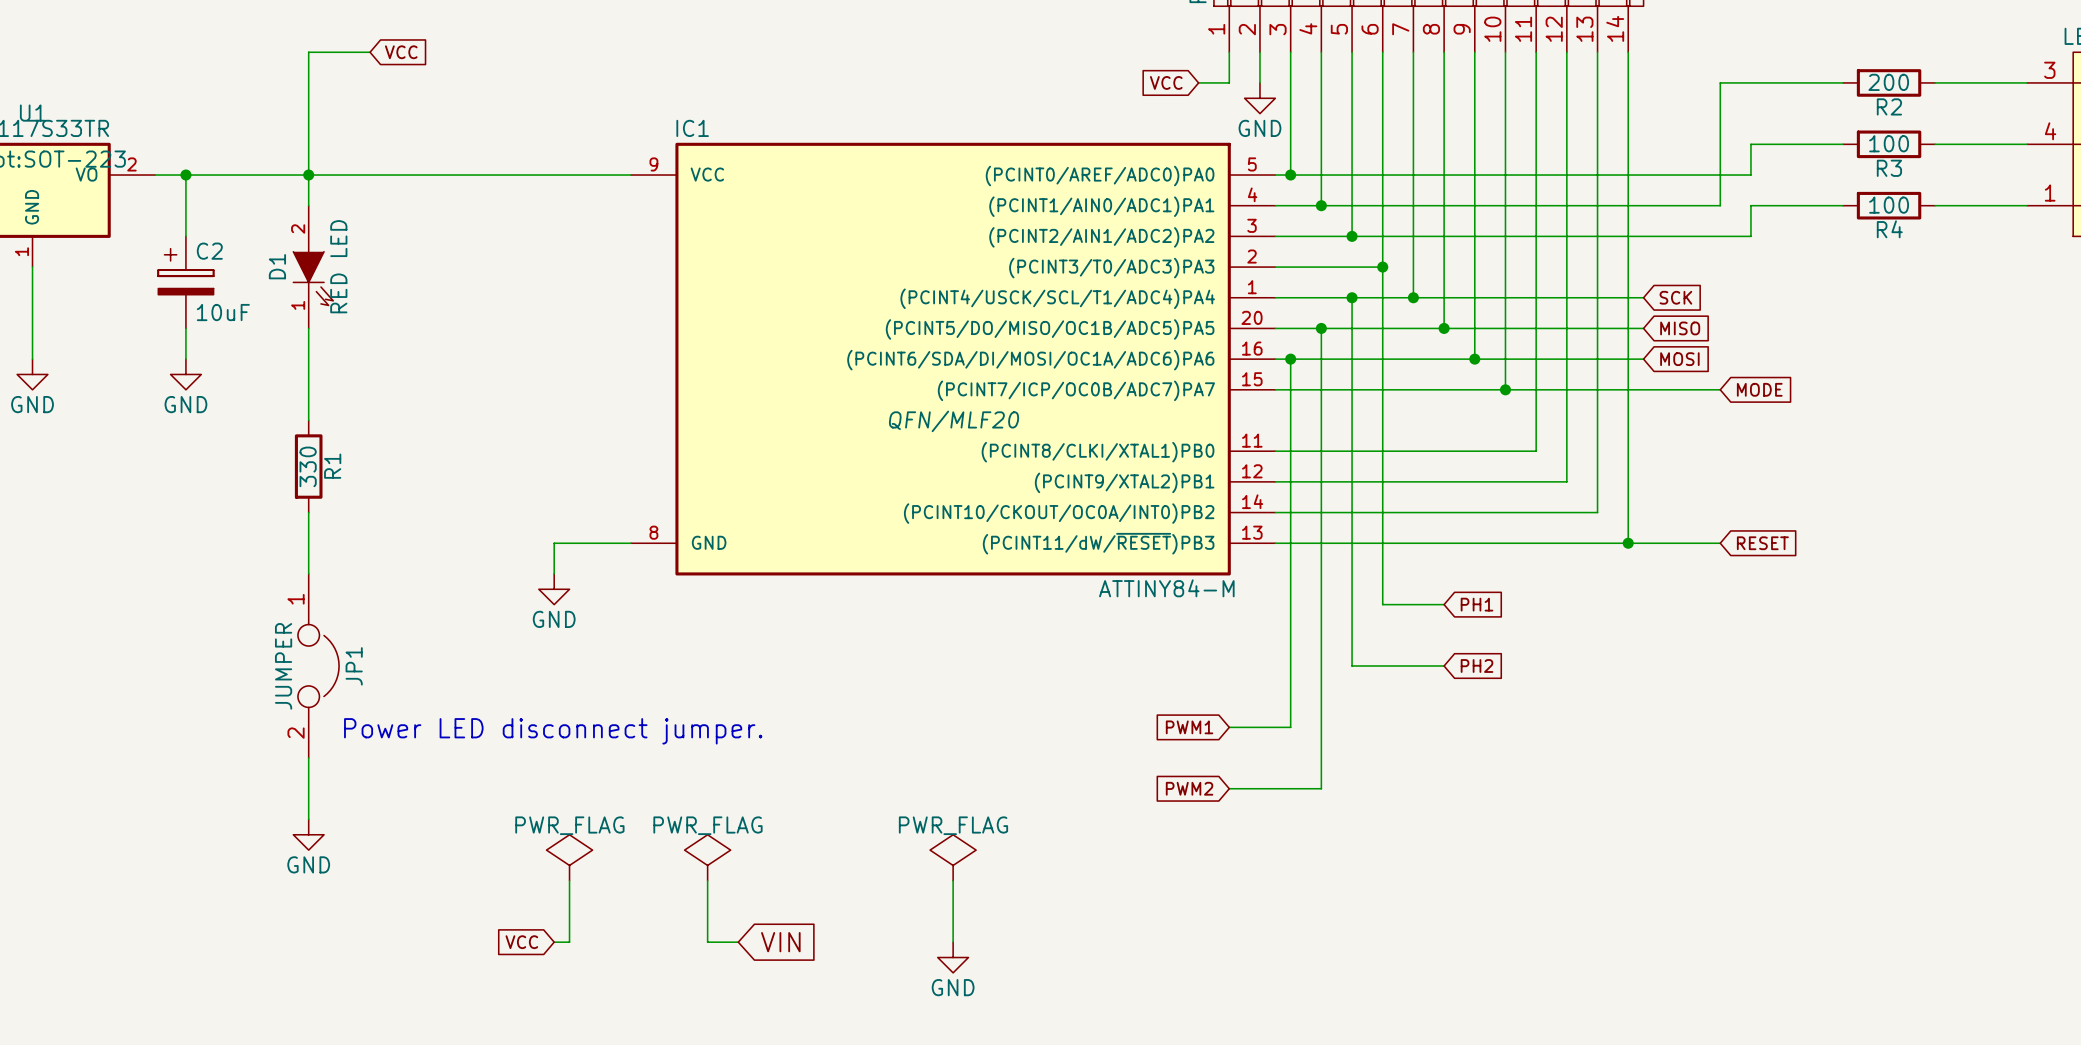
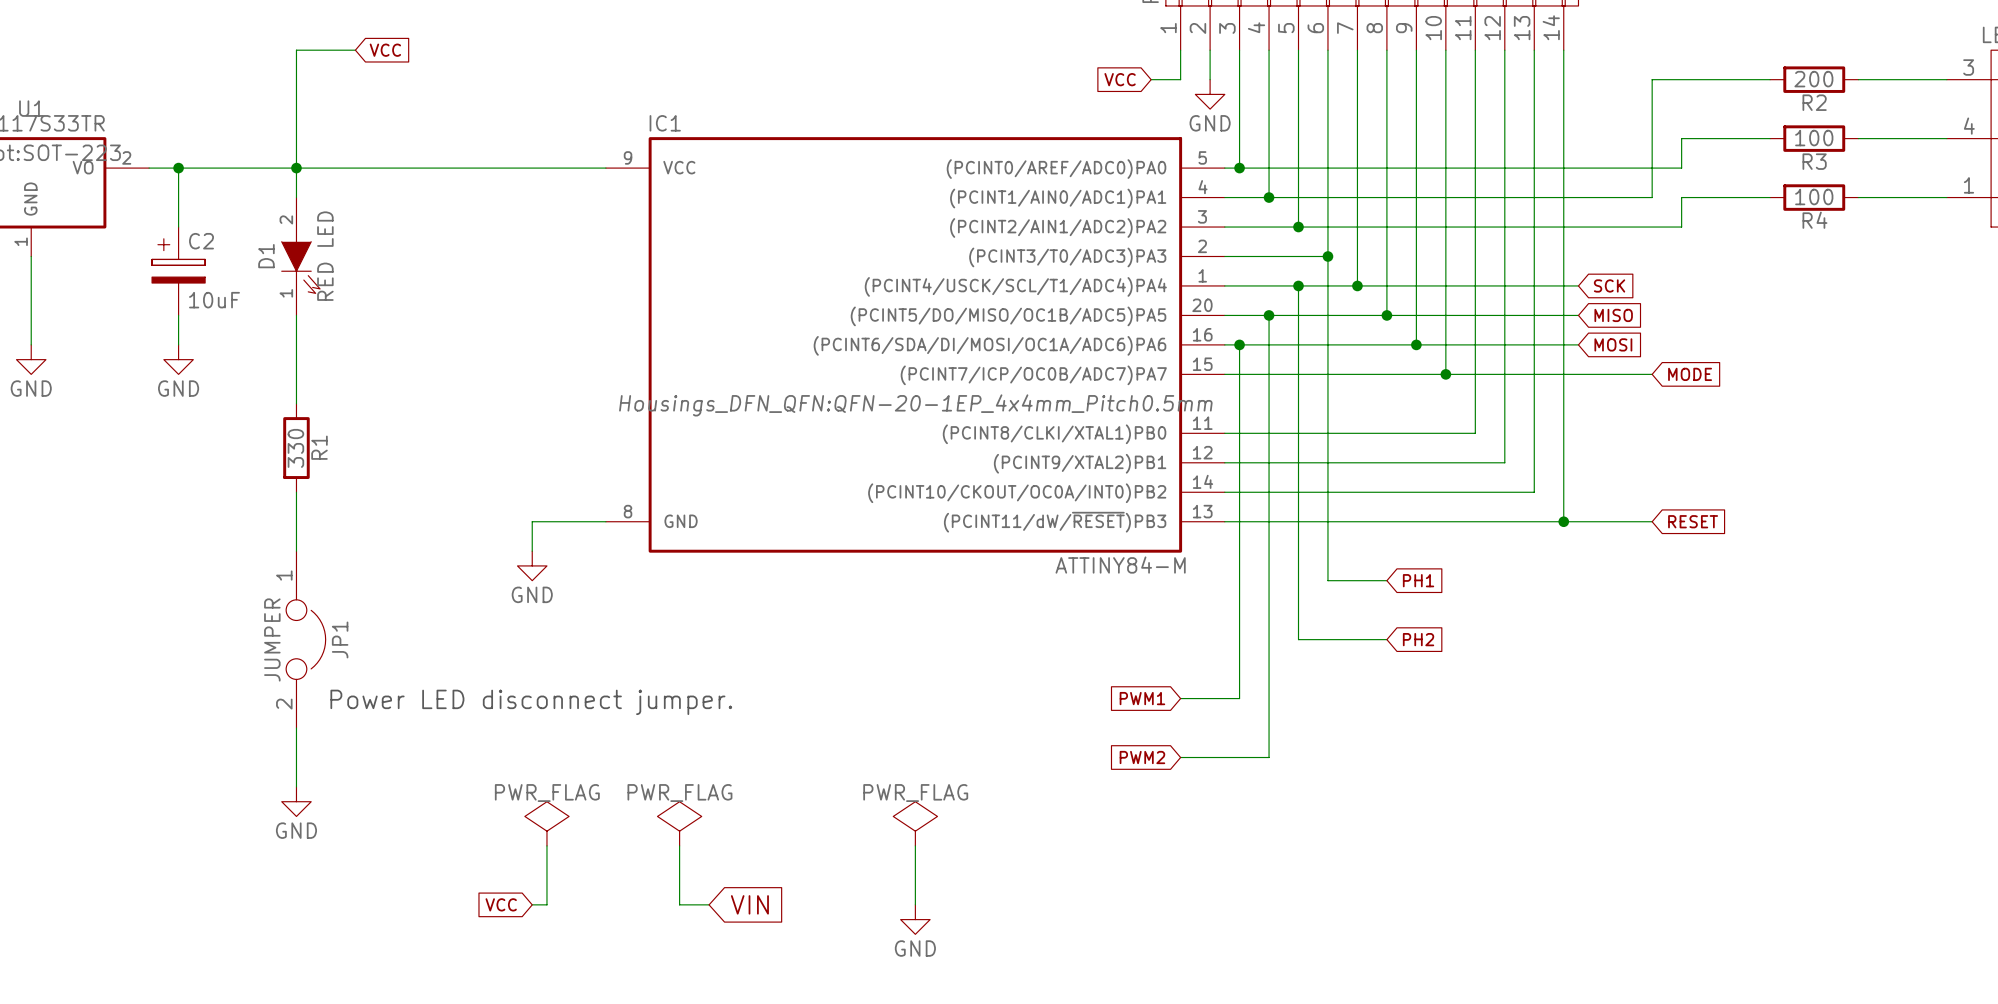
IC1 text: QFN/MLF20 (954, 421) -> Housings_DFN_QFN:QFN-20-1EP_4x4mm_Pitch0.5mm (915, 405)

